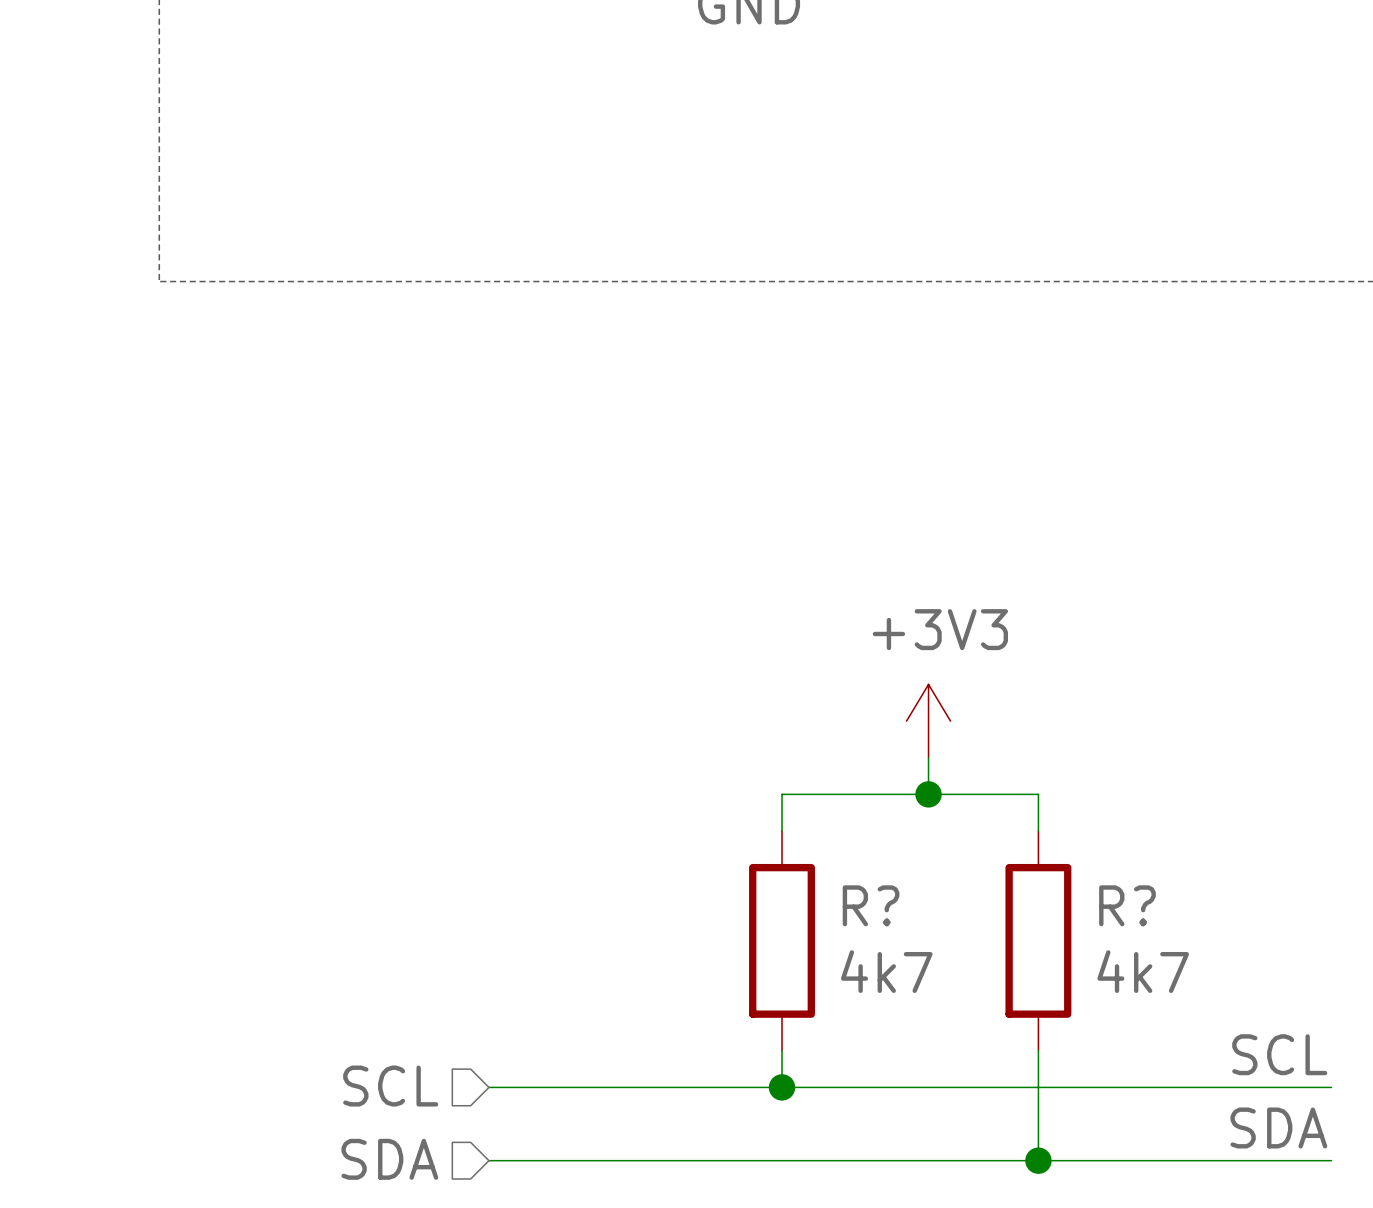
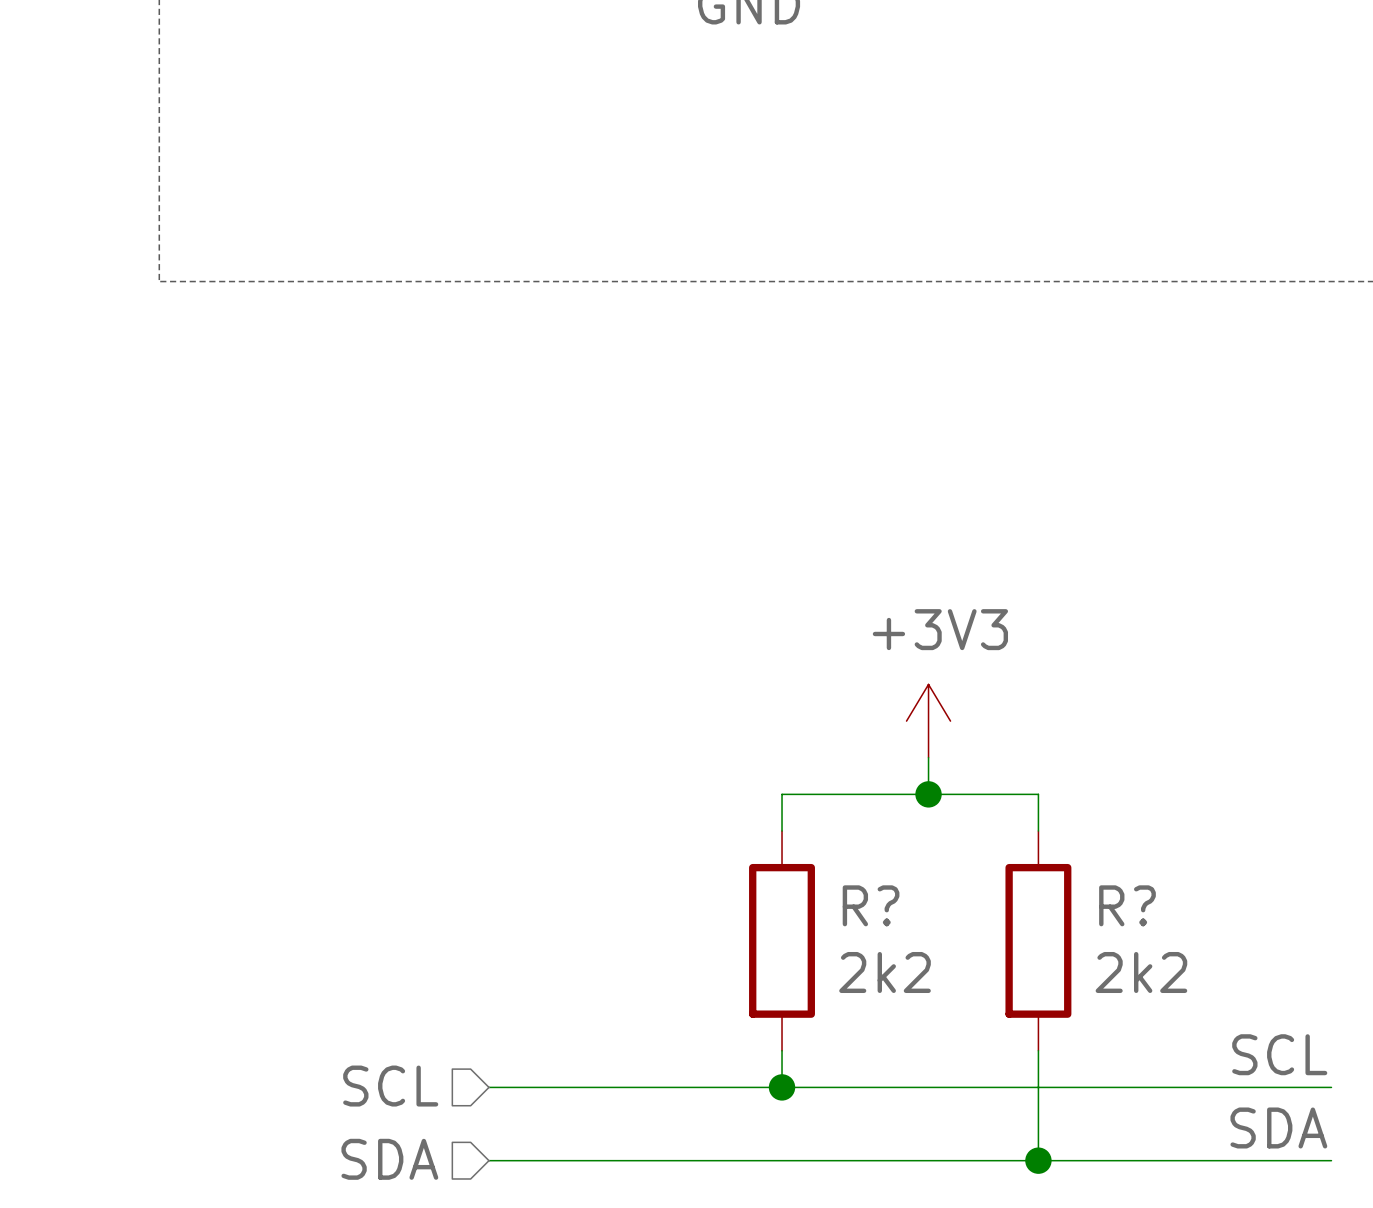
R? value: 4k7 (886, 971) -> 2k2 (885, 972)
R? value: 4k7 (1143, 971) -> 2k2 (1141, 972)

